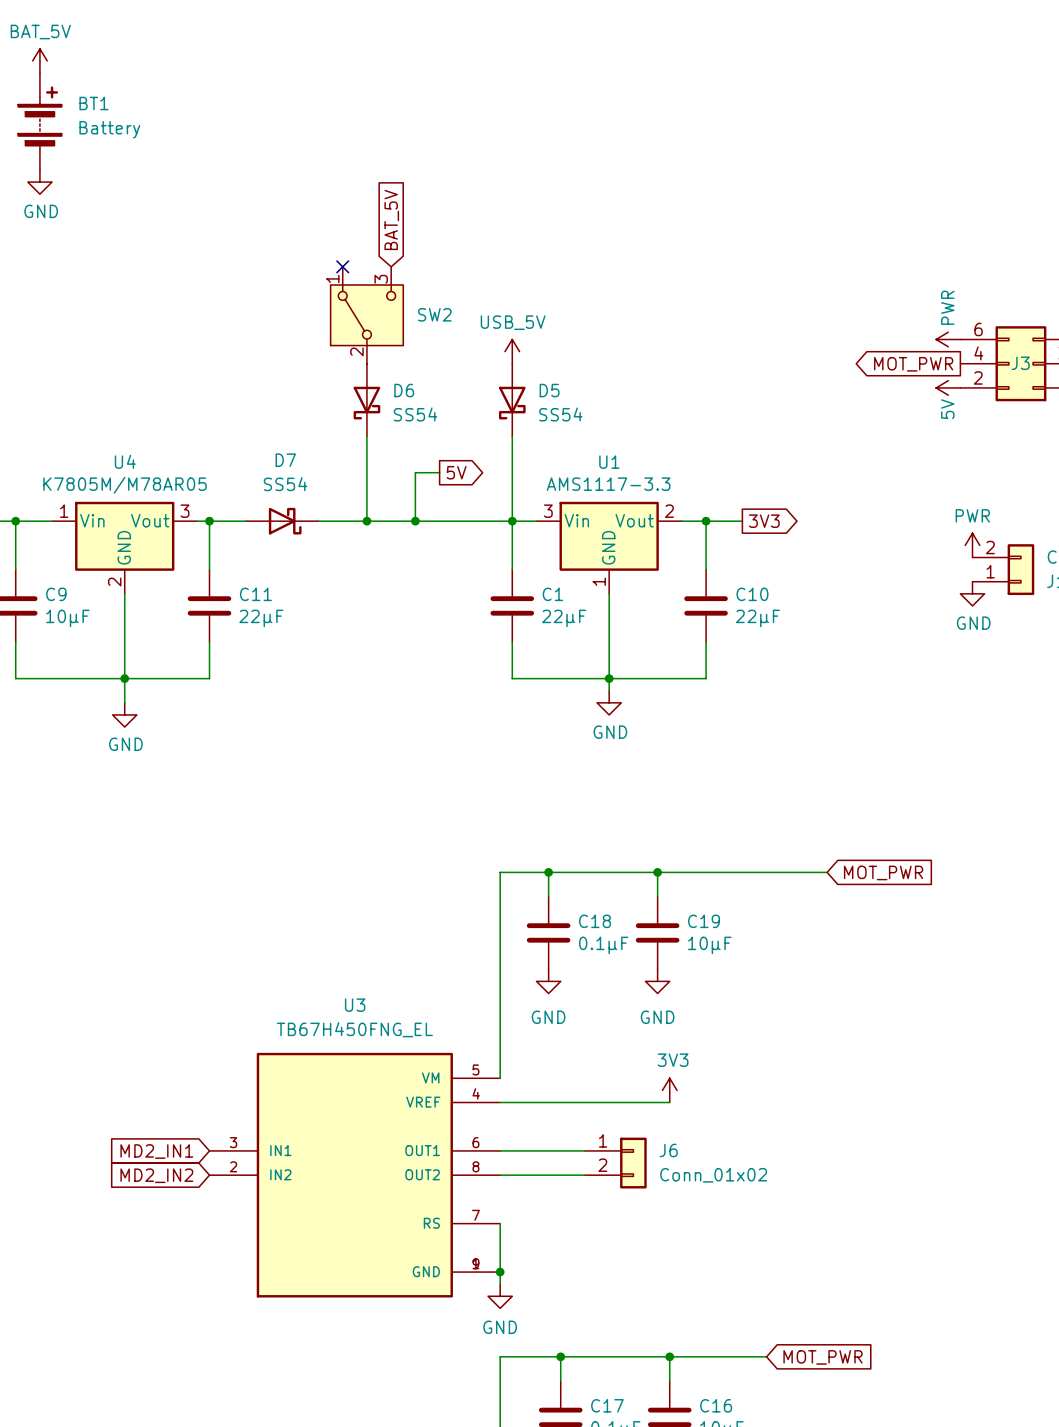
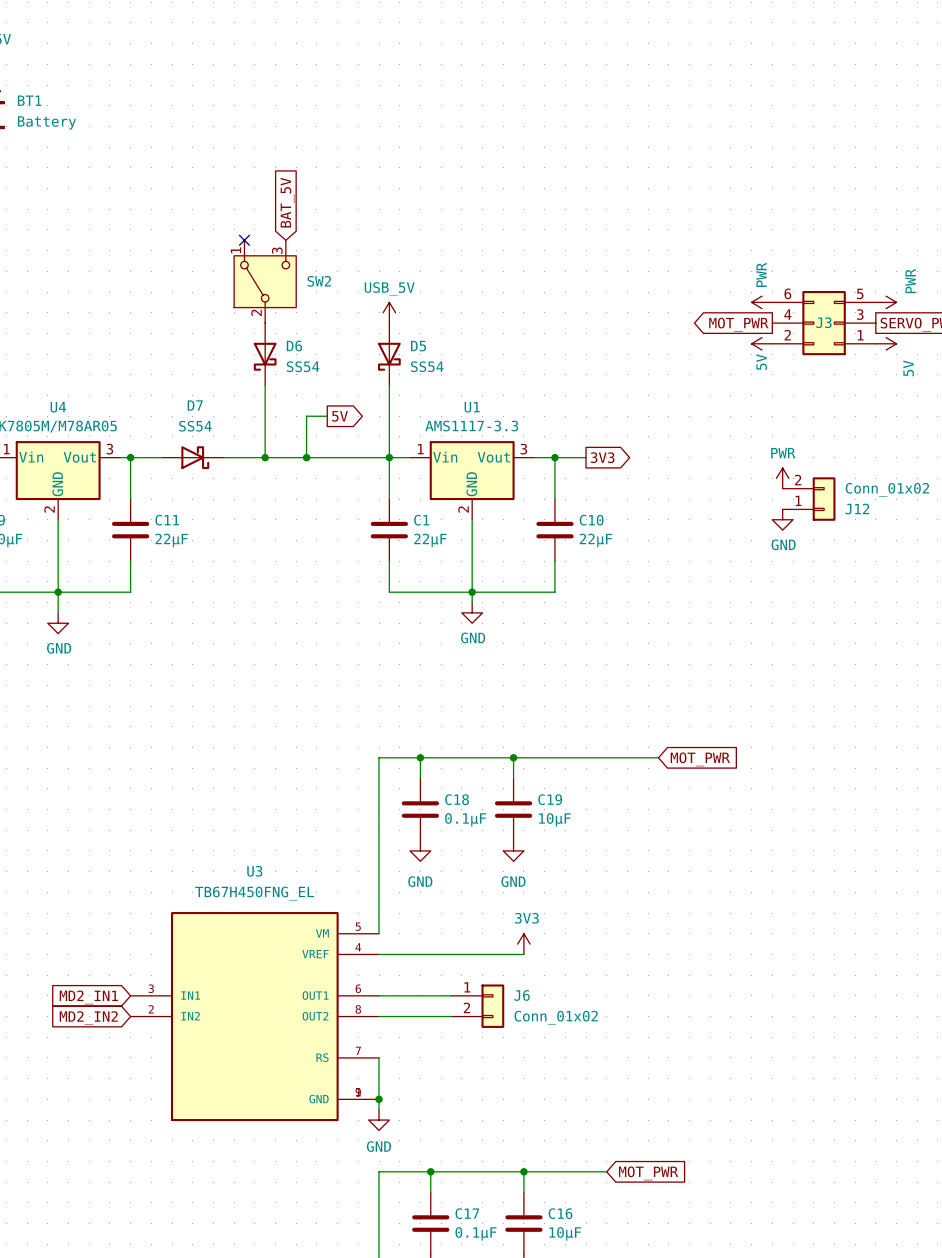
U1 pin number: 3 (548, 511) -> 1 (420, 449)
U1 pin number: 2 (669, 511) -> 3 (523, 449)
U1 pin number: 1 (599, 581) -> 2 (463, 509)

